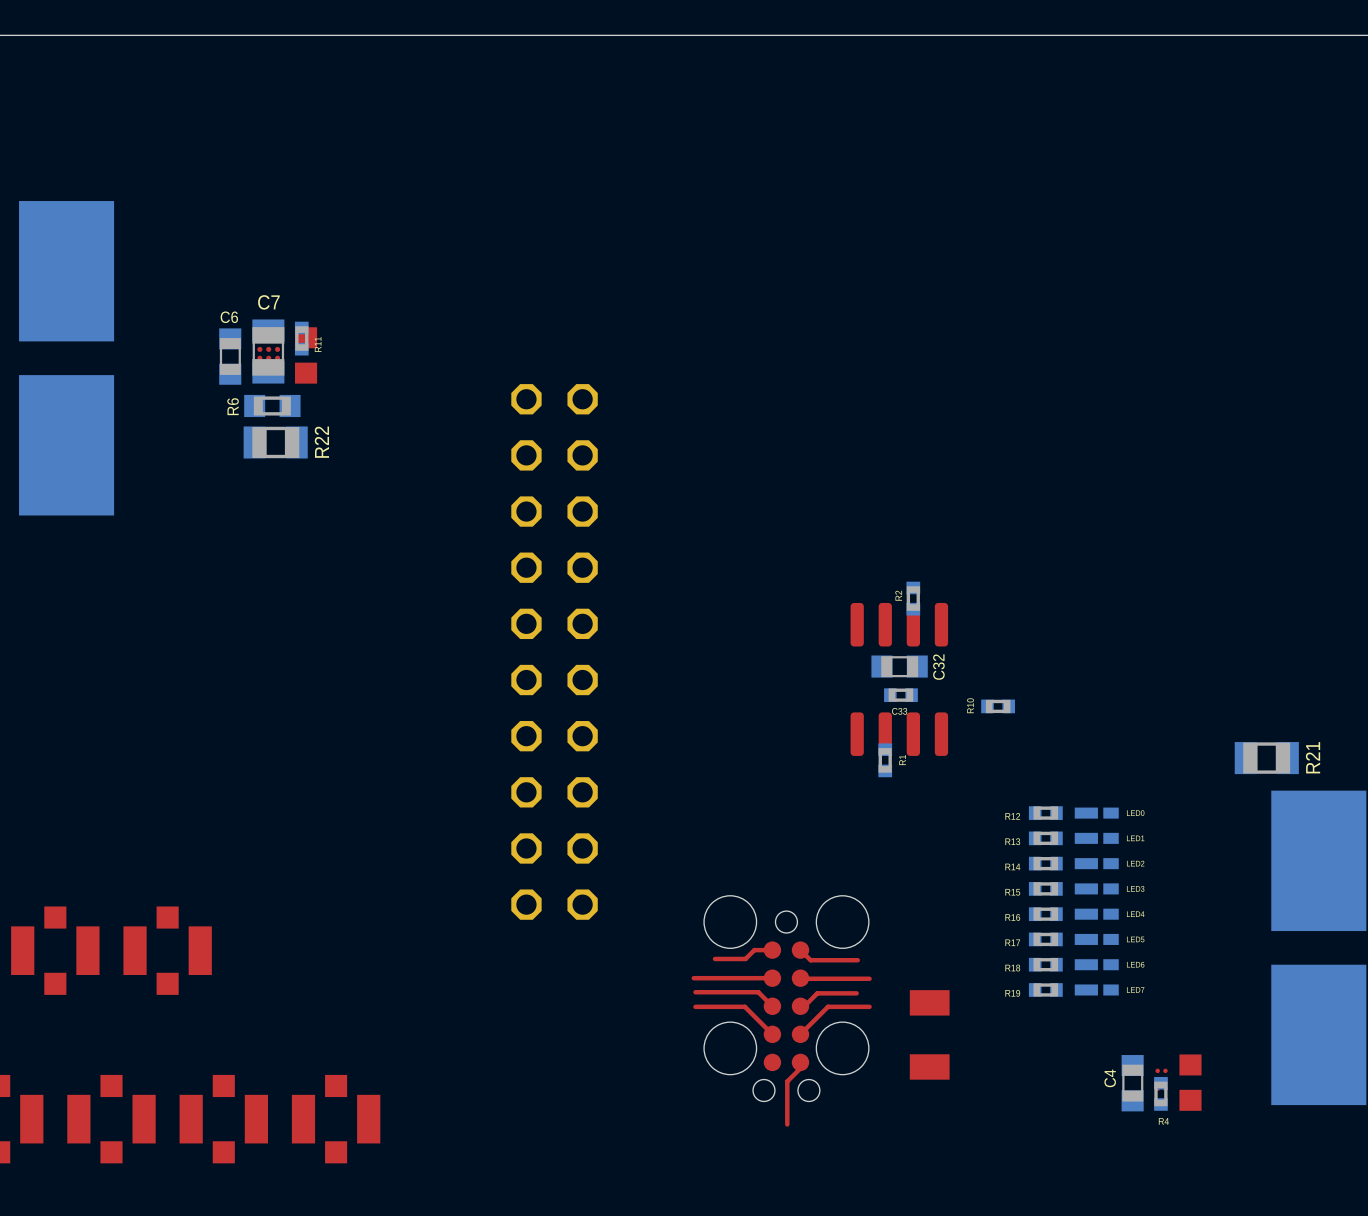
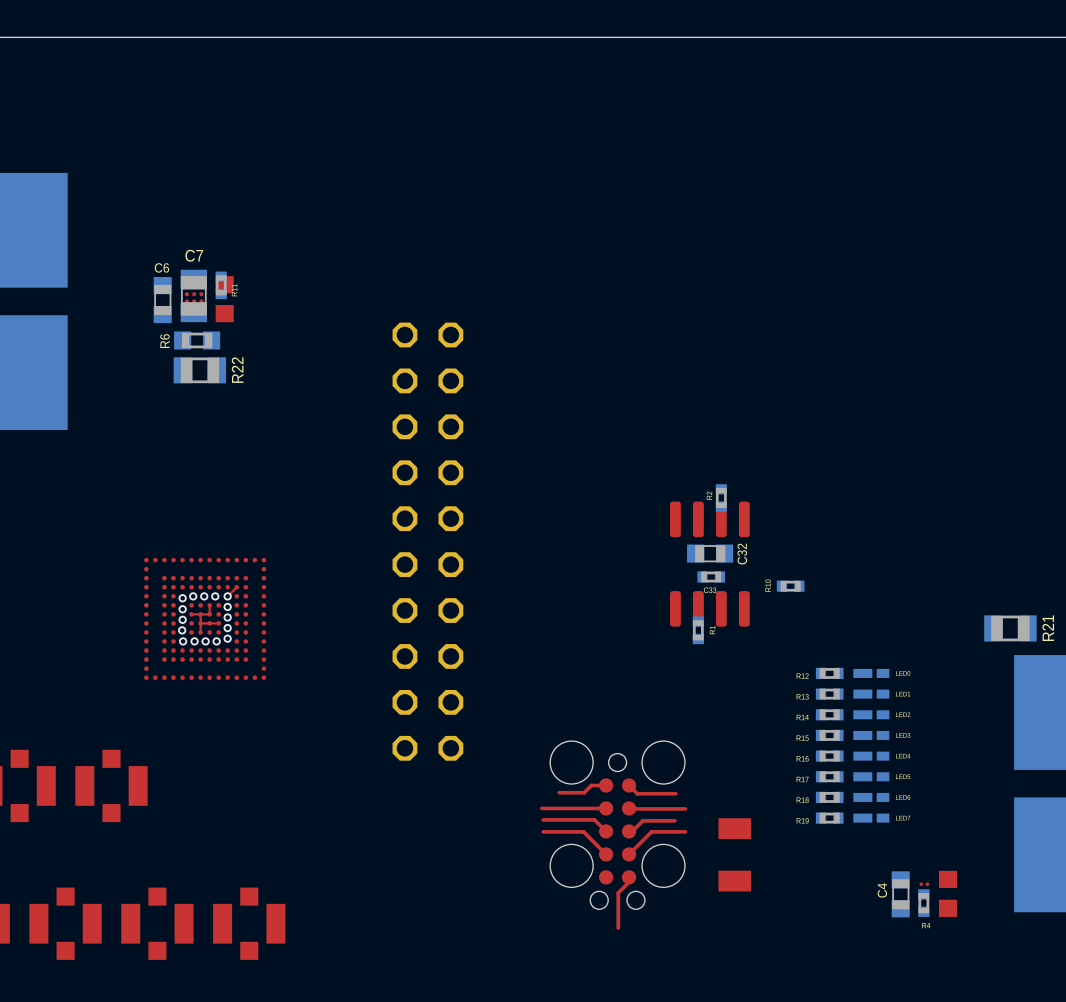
top track: none -> (236, 587) (227, 596)
via: none -> (193, 596)
via: none -> (204, 596)
via: none -> (215, 596)
via: none -> (227, 596)
via: none -> (182, 598)
top track: none -> (209, 605) (209, 614) (191, 614)
via: none -> (227, 606)
via: none -> (182, 609)
top track: none -> (200, 614) (200, 632)
via: none -> (227, 617)
part: none -> (205, 618)
via: none -> (182, 619)
top track: none -> (218, 623) (200, 623)
via: none -> (227, 628)
via: none -> (182, 630)
via: none -> (227, 638)
via: none -> (183, 641)
via: none -> (194, 641)
via: none -> (205, 641)
via: none -> (216, 641)

